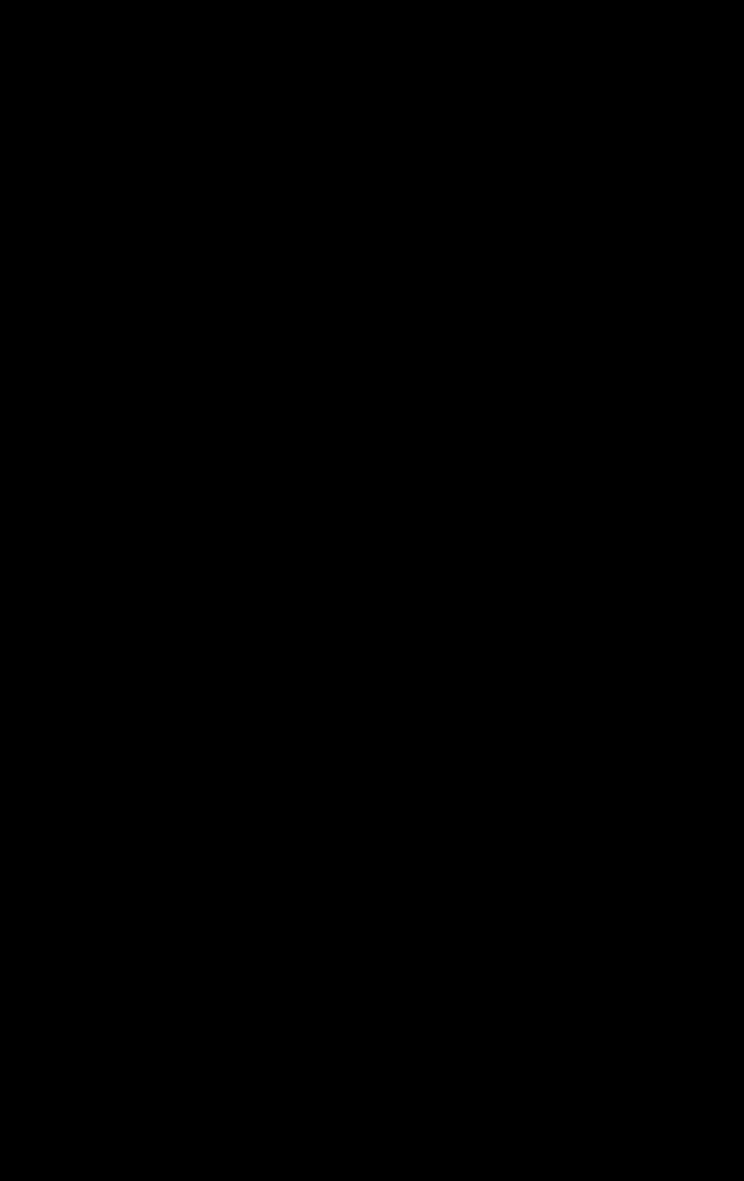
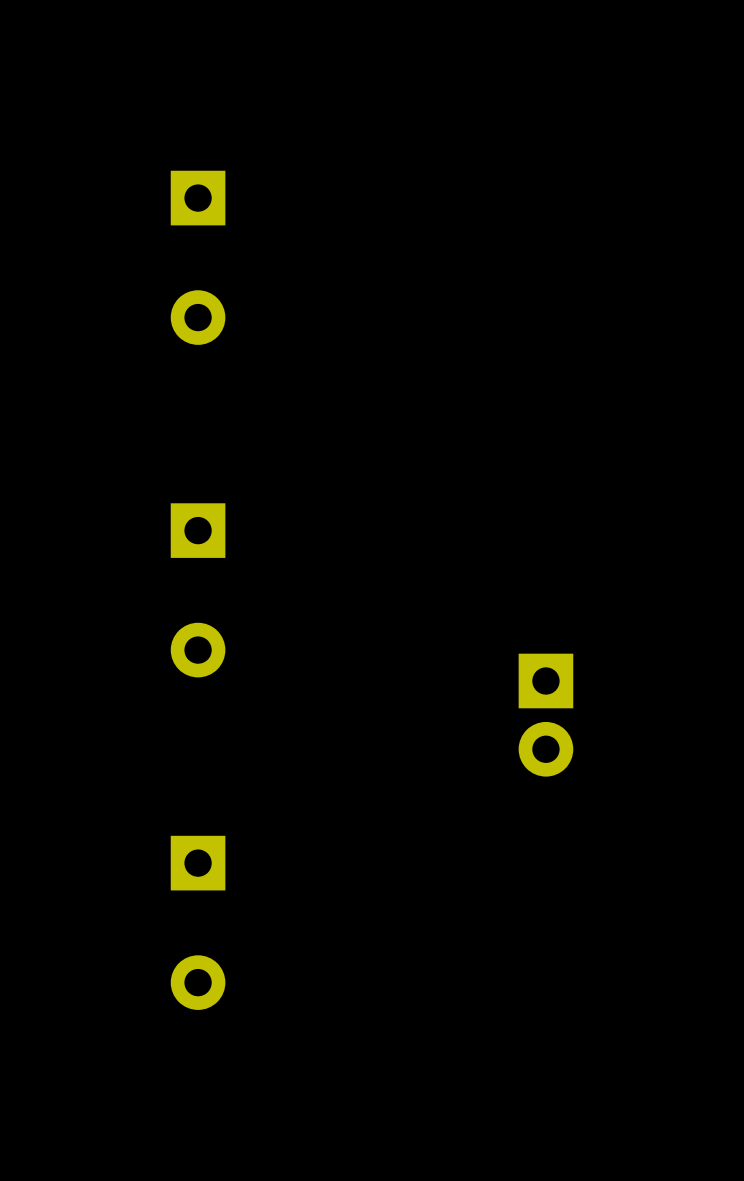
part: none -> (198, 257)
part: none -> (198, 590)
part: none -> (545, 715)
part: none -> (198, 922)

